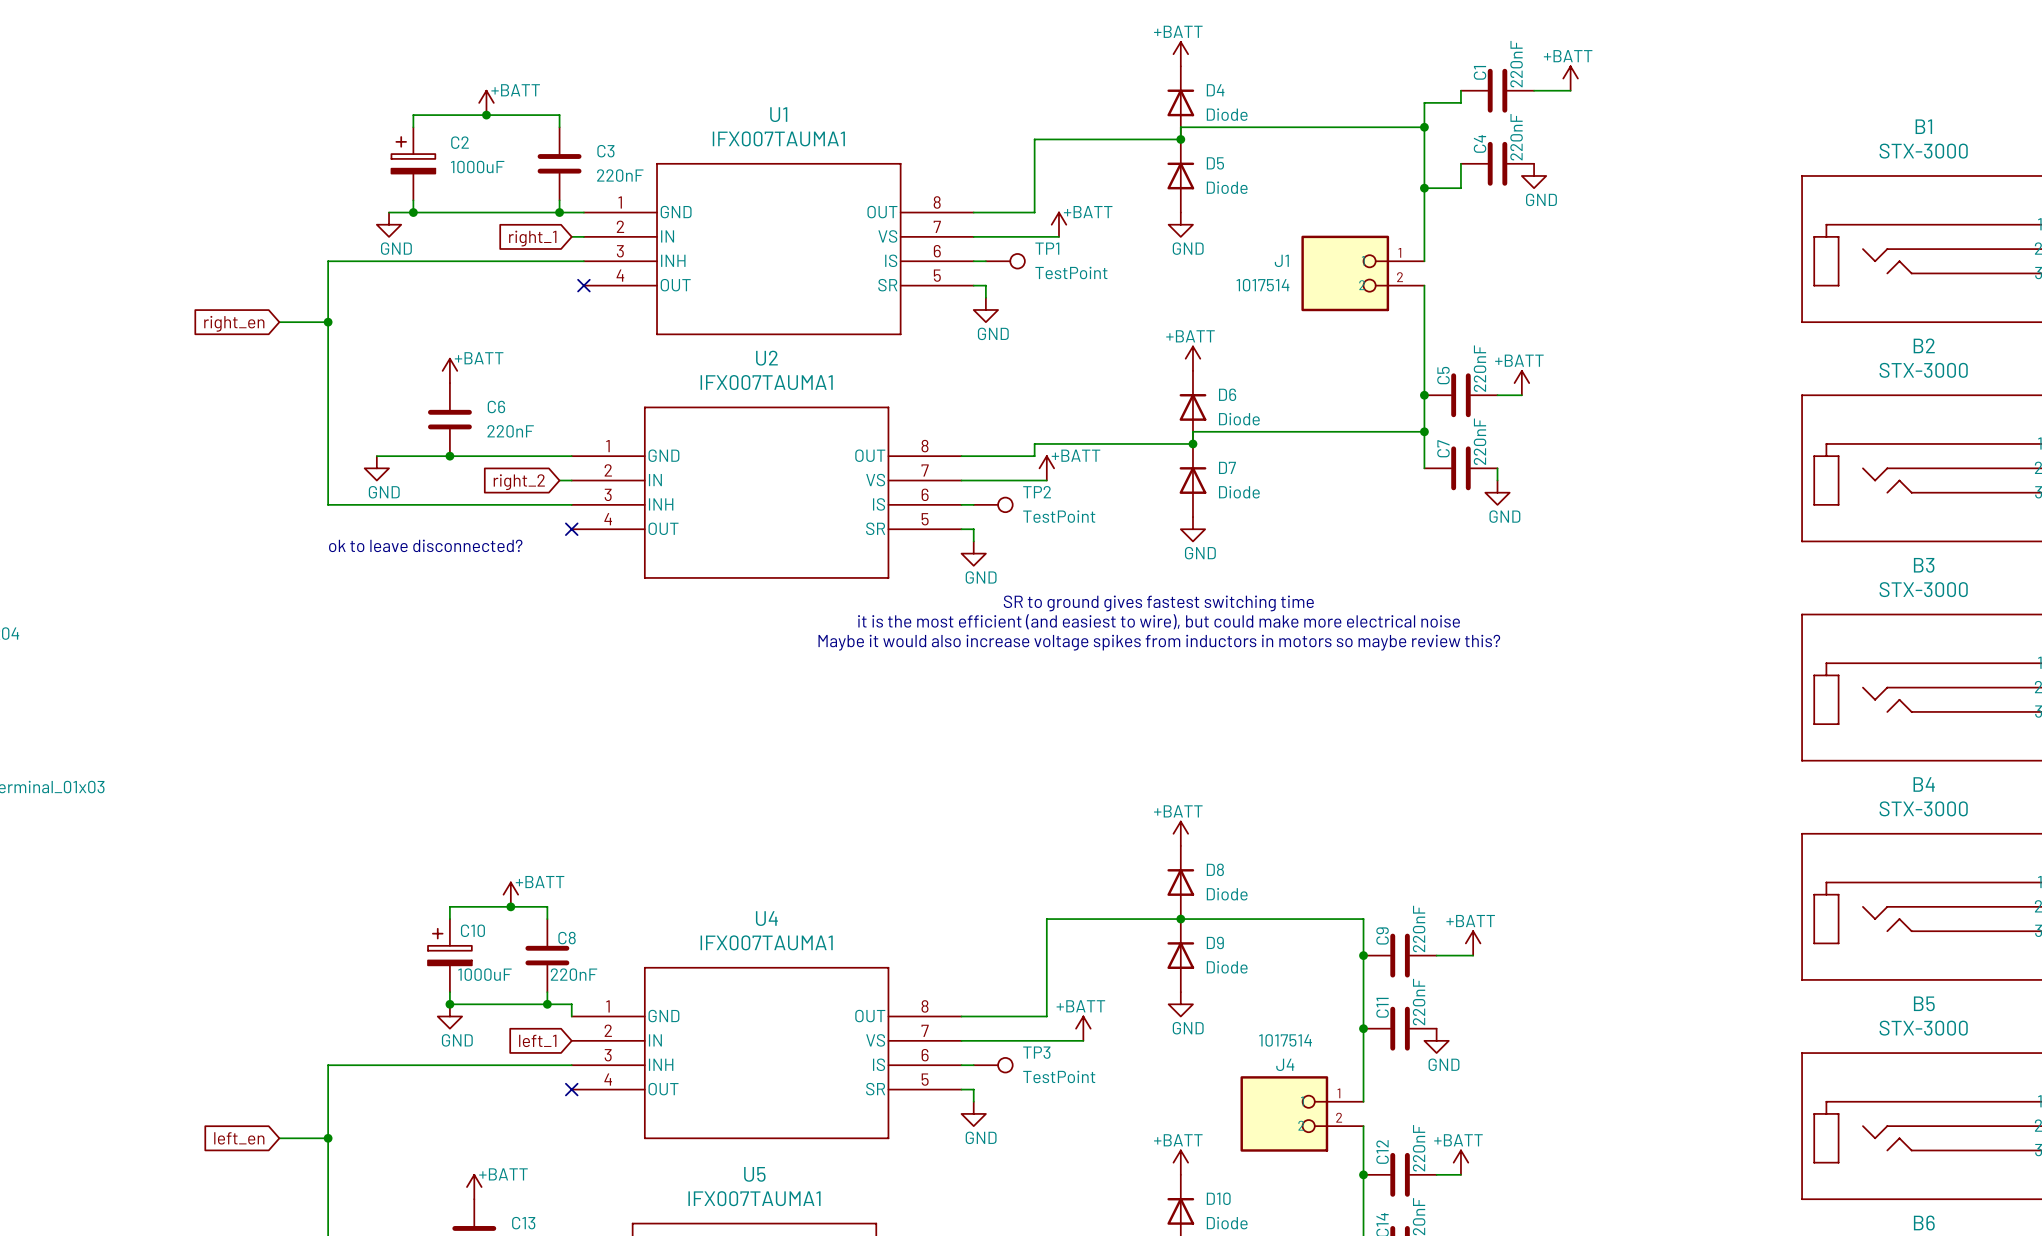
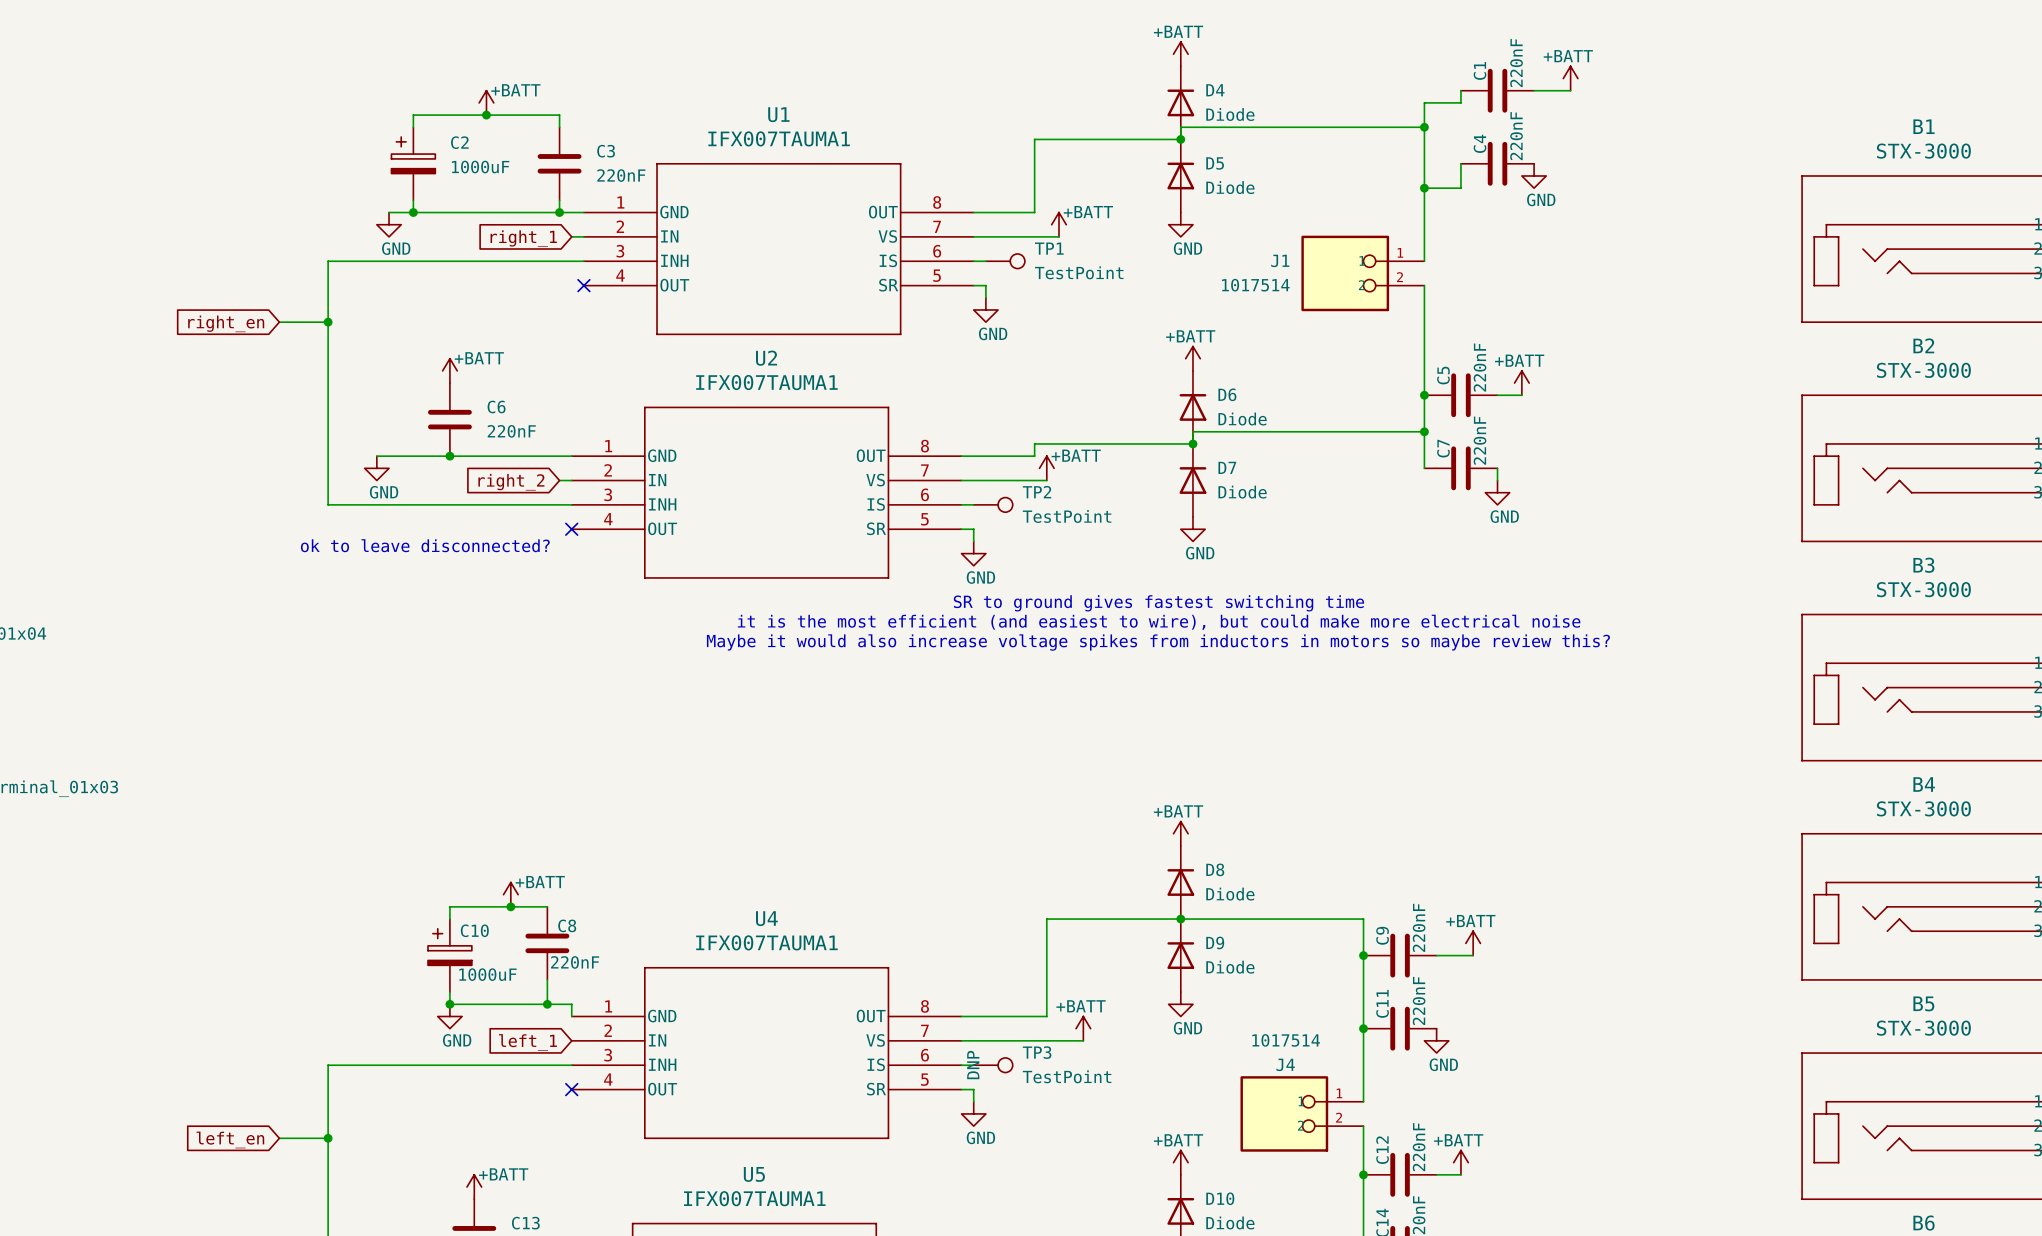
C8 position: (547, 955) -> (547, 943)
TP3 text: none -> DNP (973, 1065)

